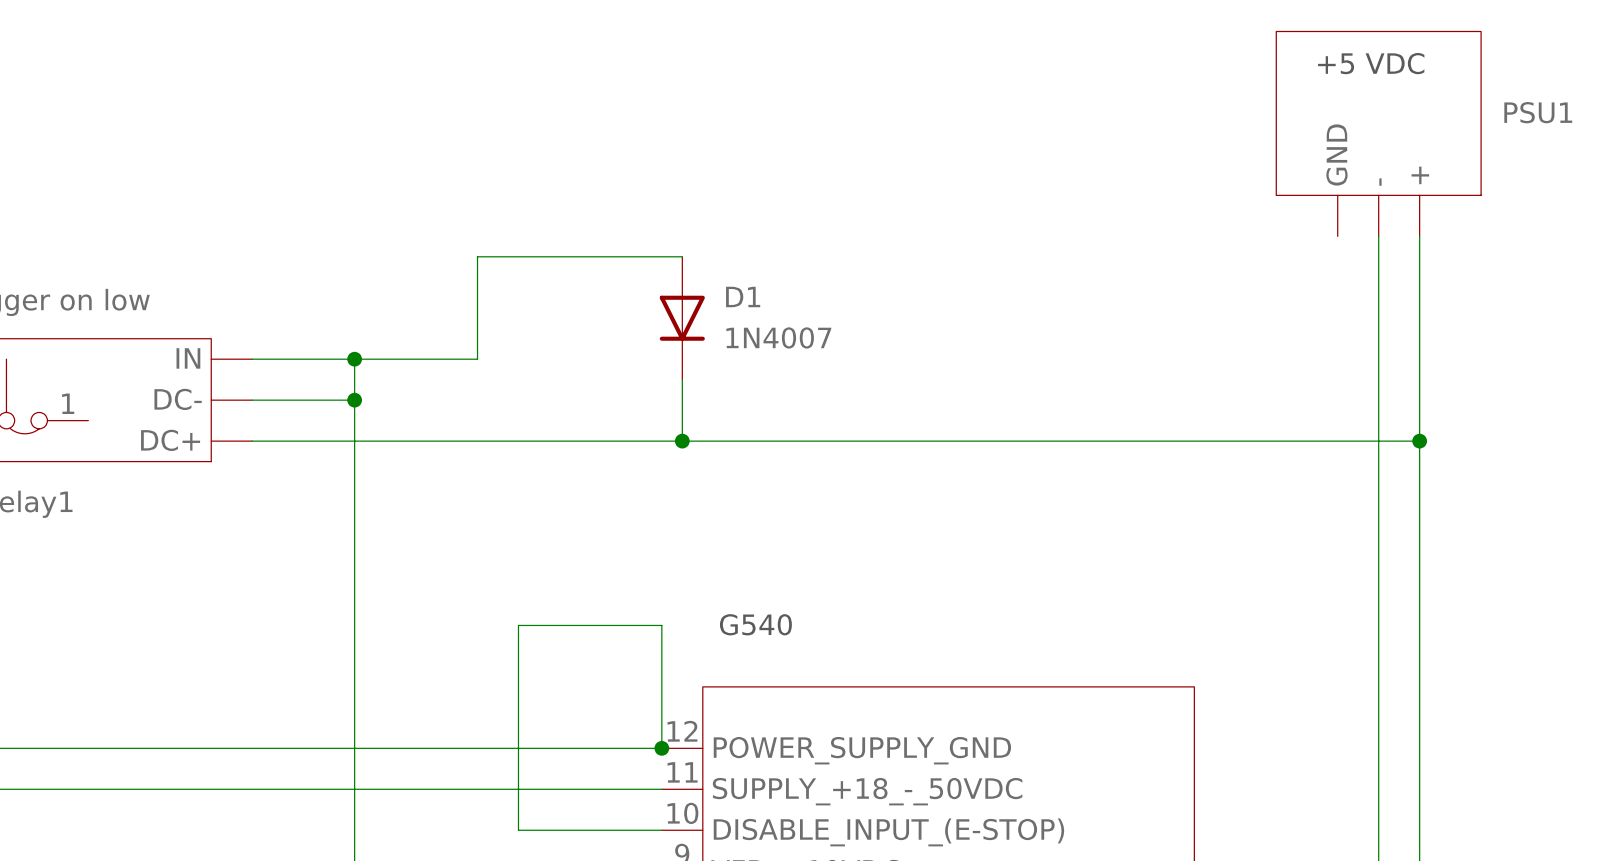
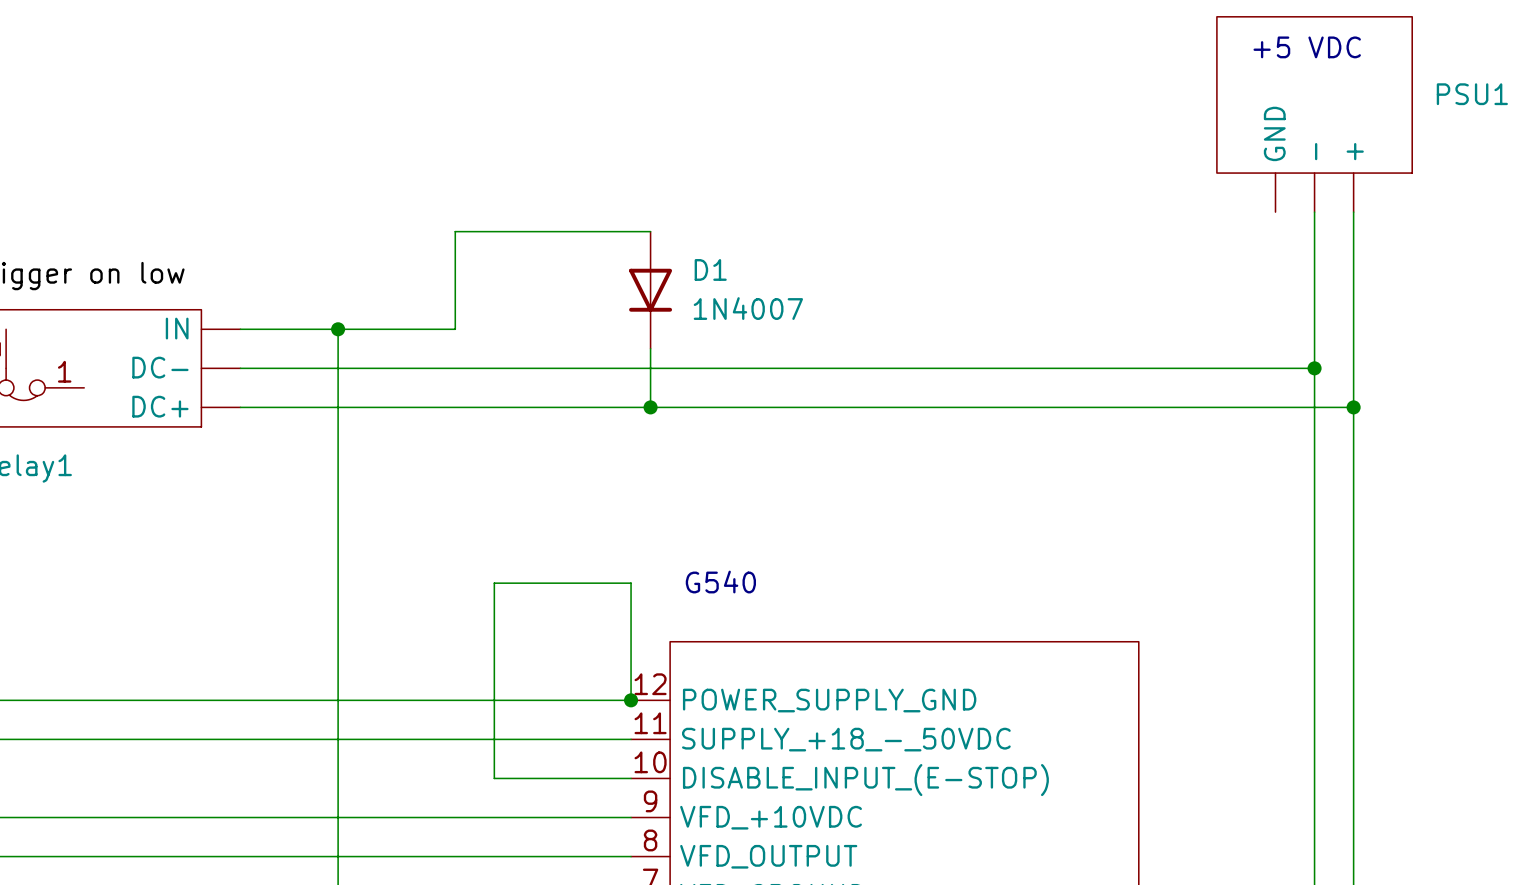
wire: none -> (338, 368) (1314, 368)
junction: (354, 400) -> none
junction: none -> (1314, 368)

